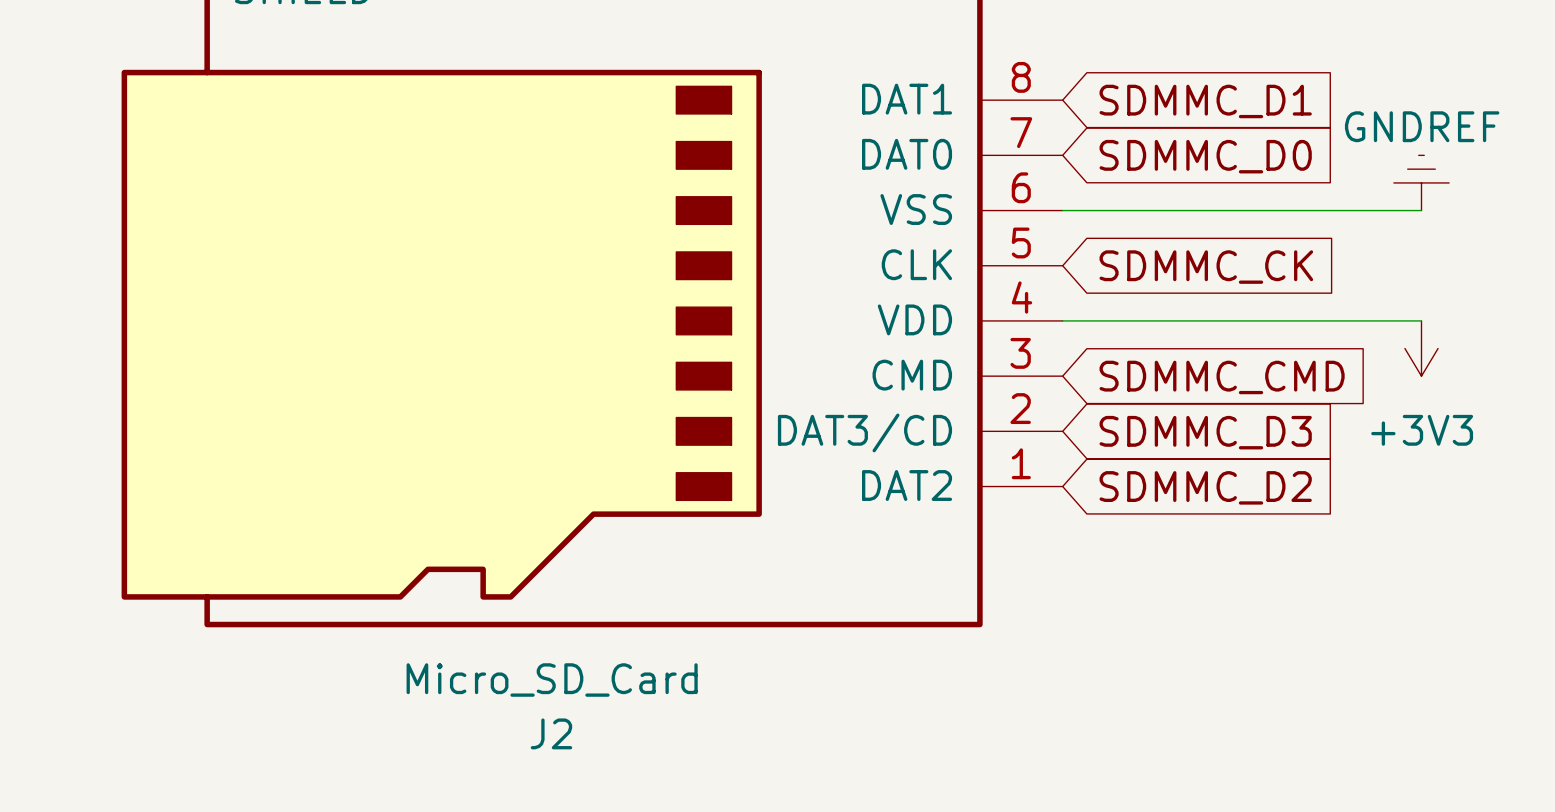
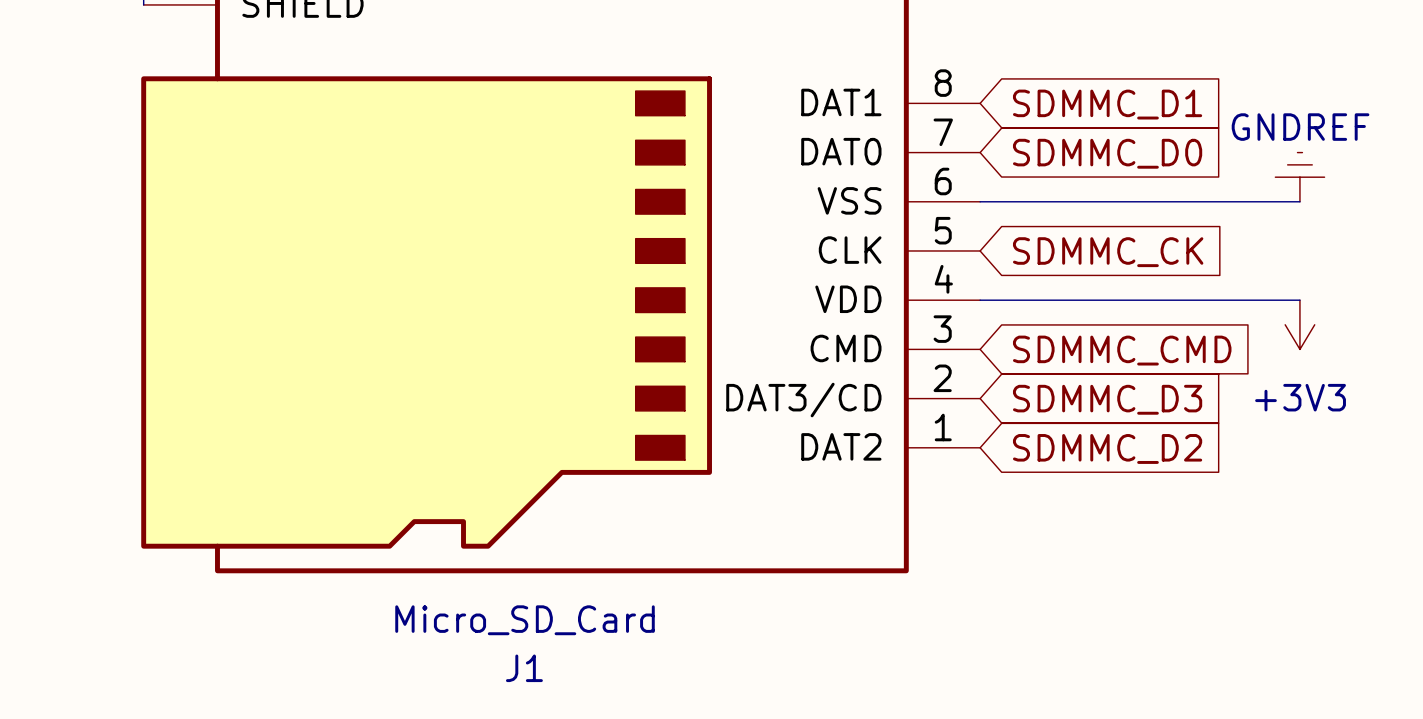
J2 name: J2 (551, 733) -> J1 (524, 668)

